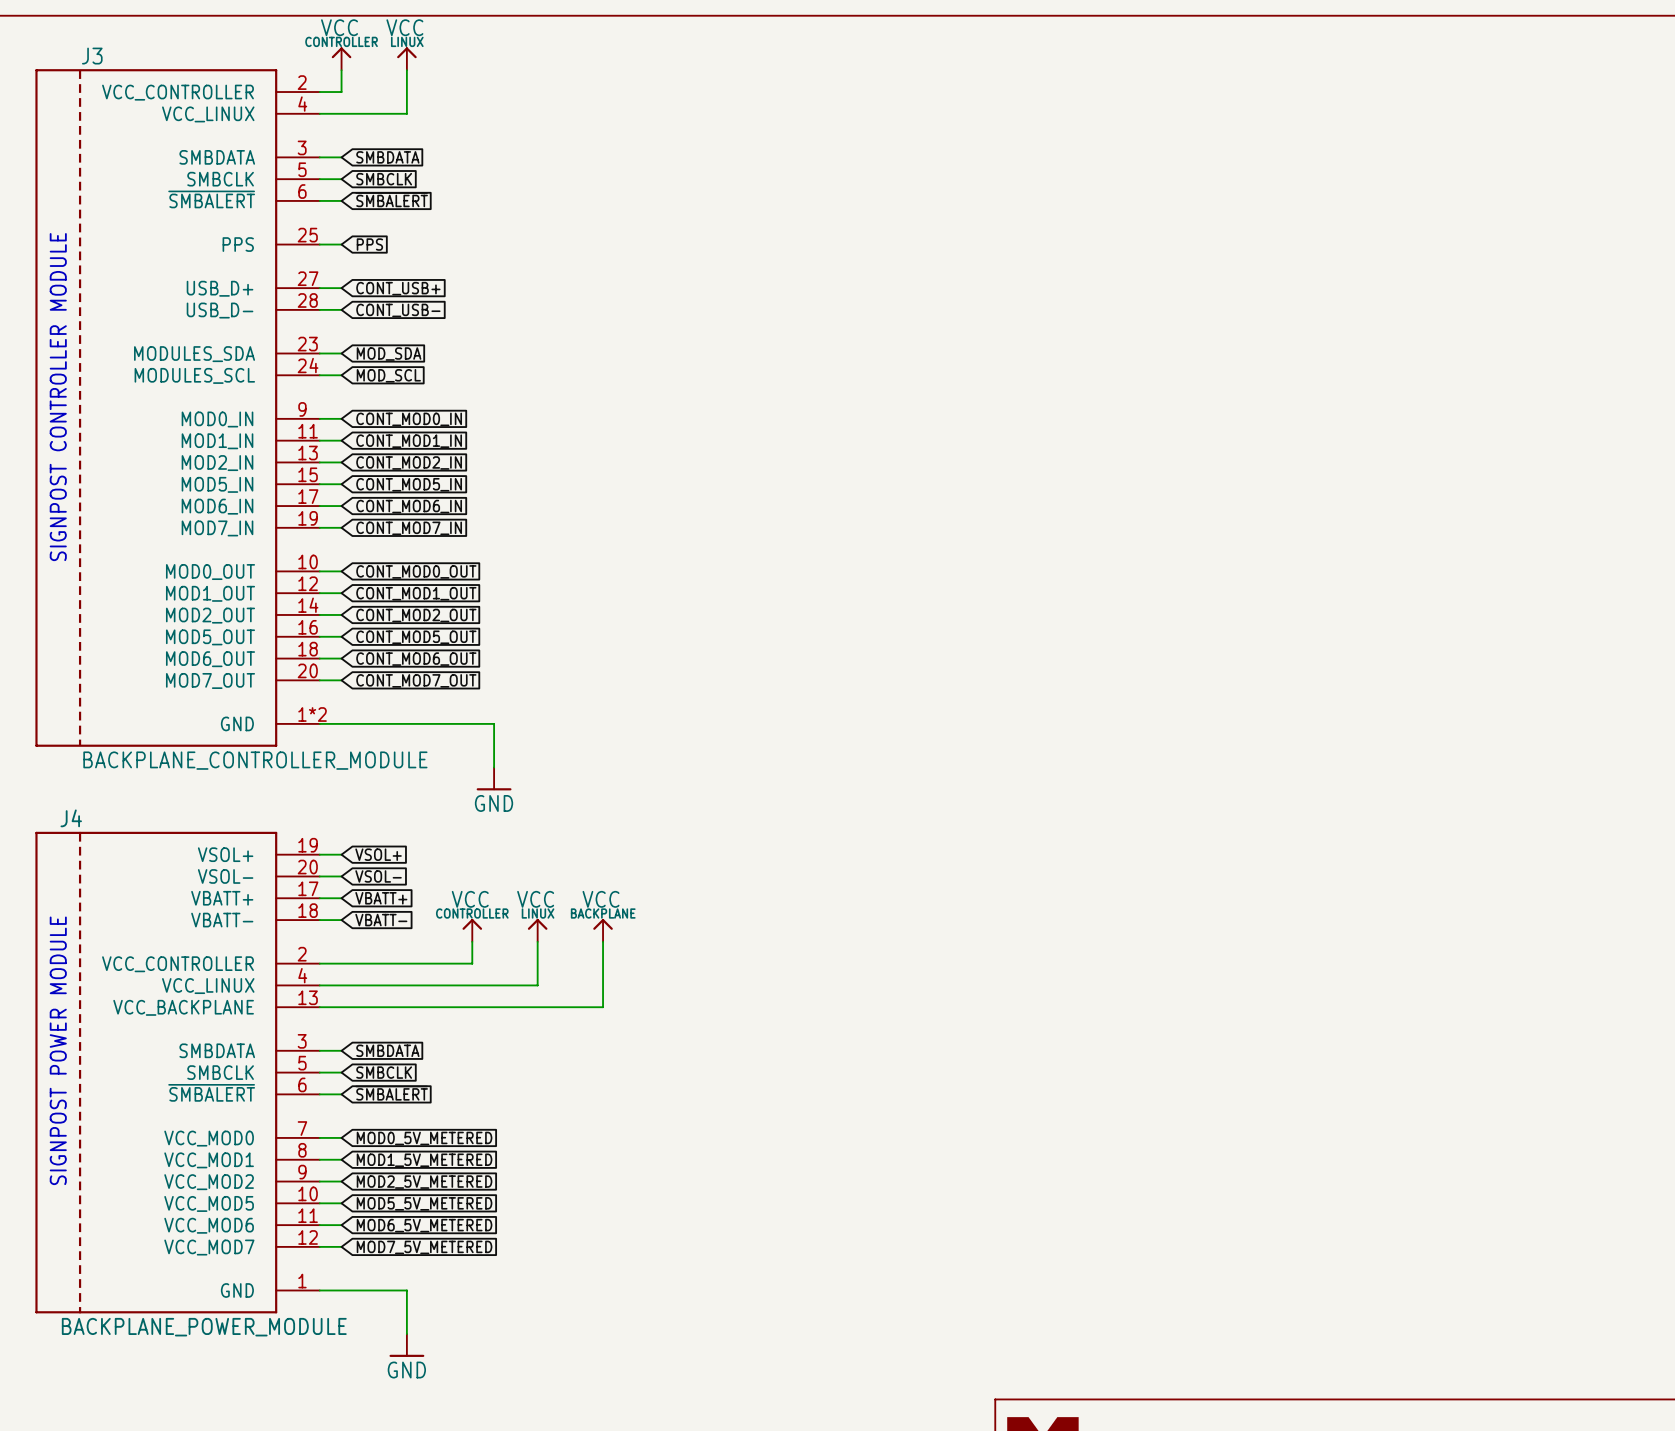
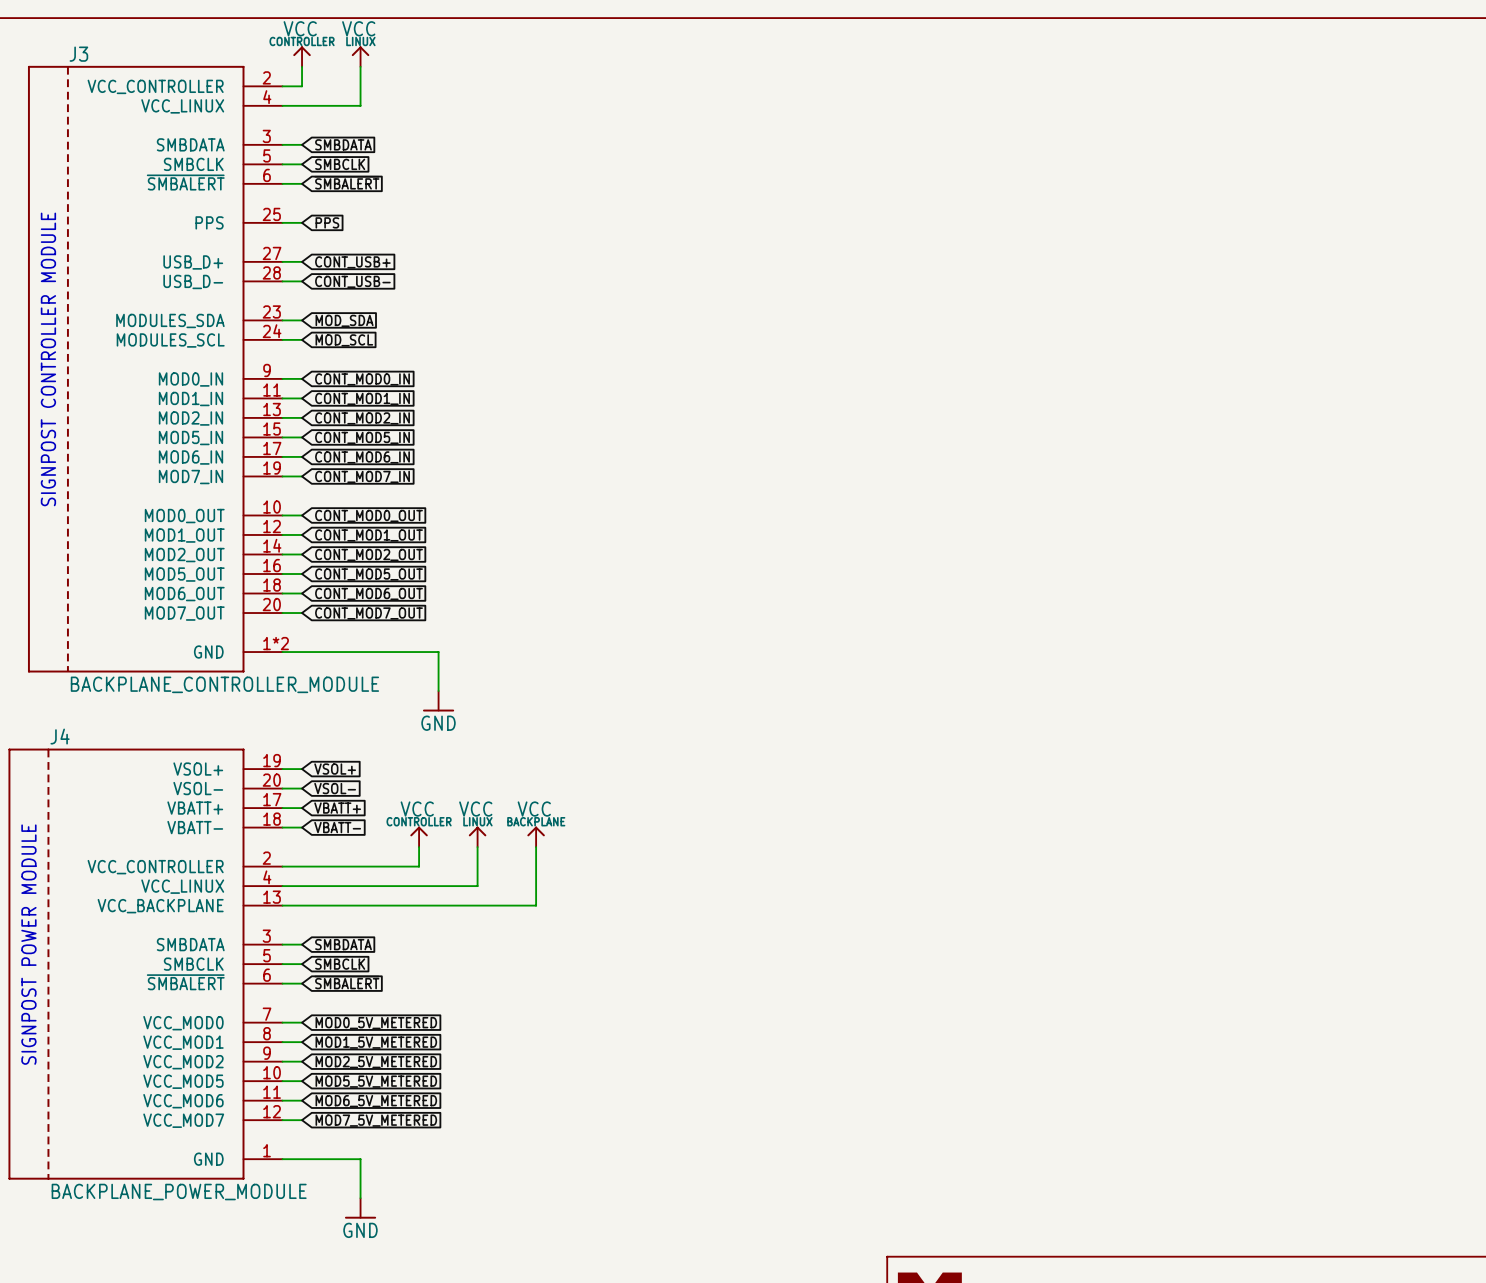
J4 symbol: [35, 831, 320, 1314] -> [8, 748, 283, 1180]

